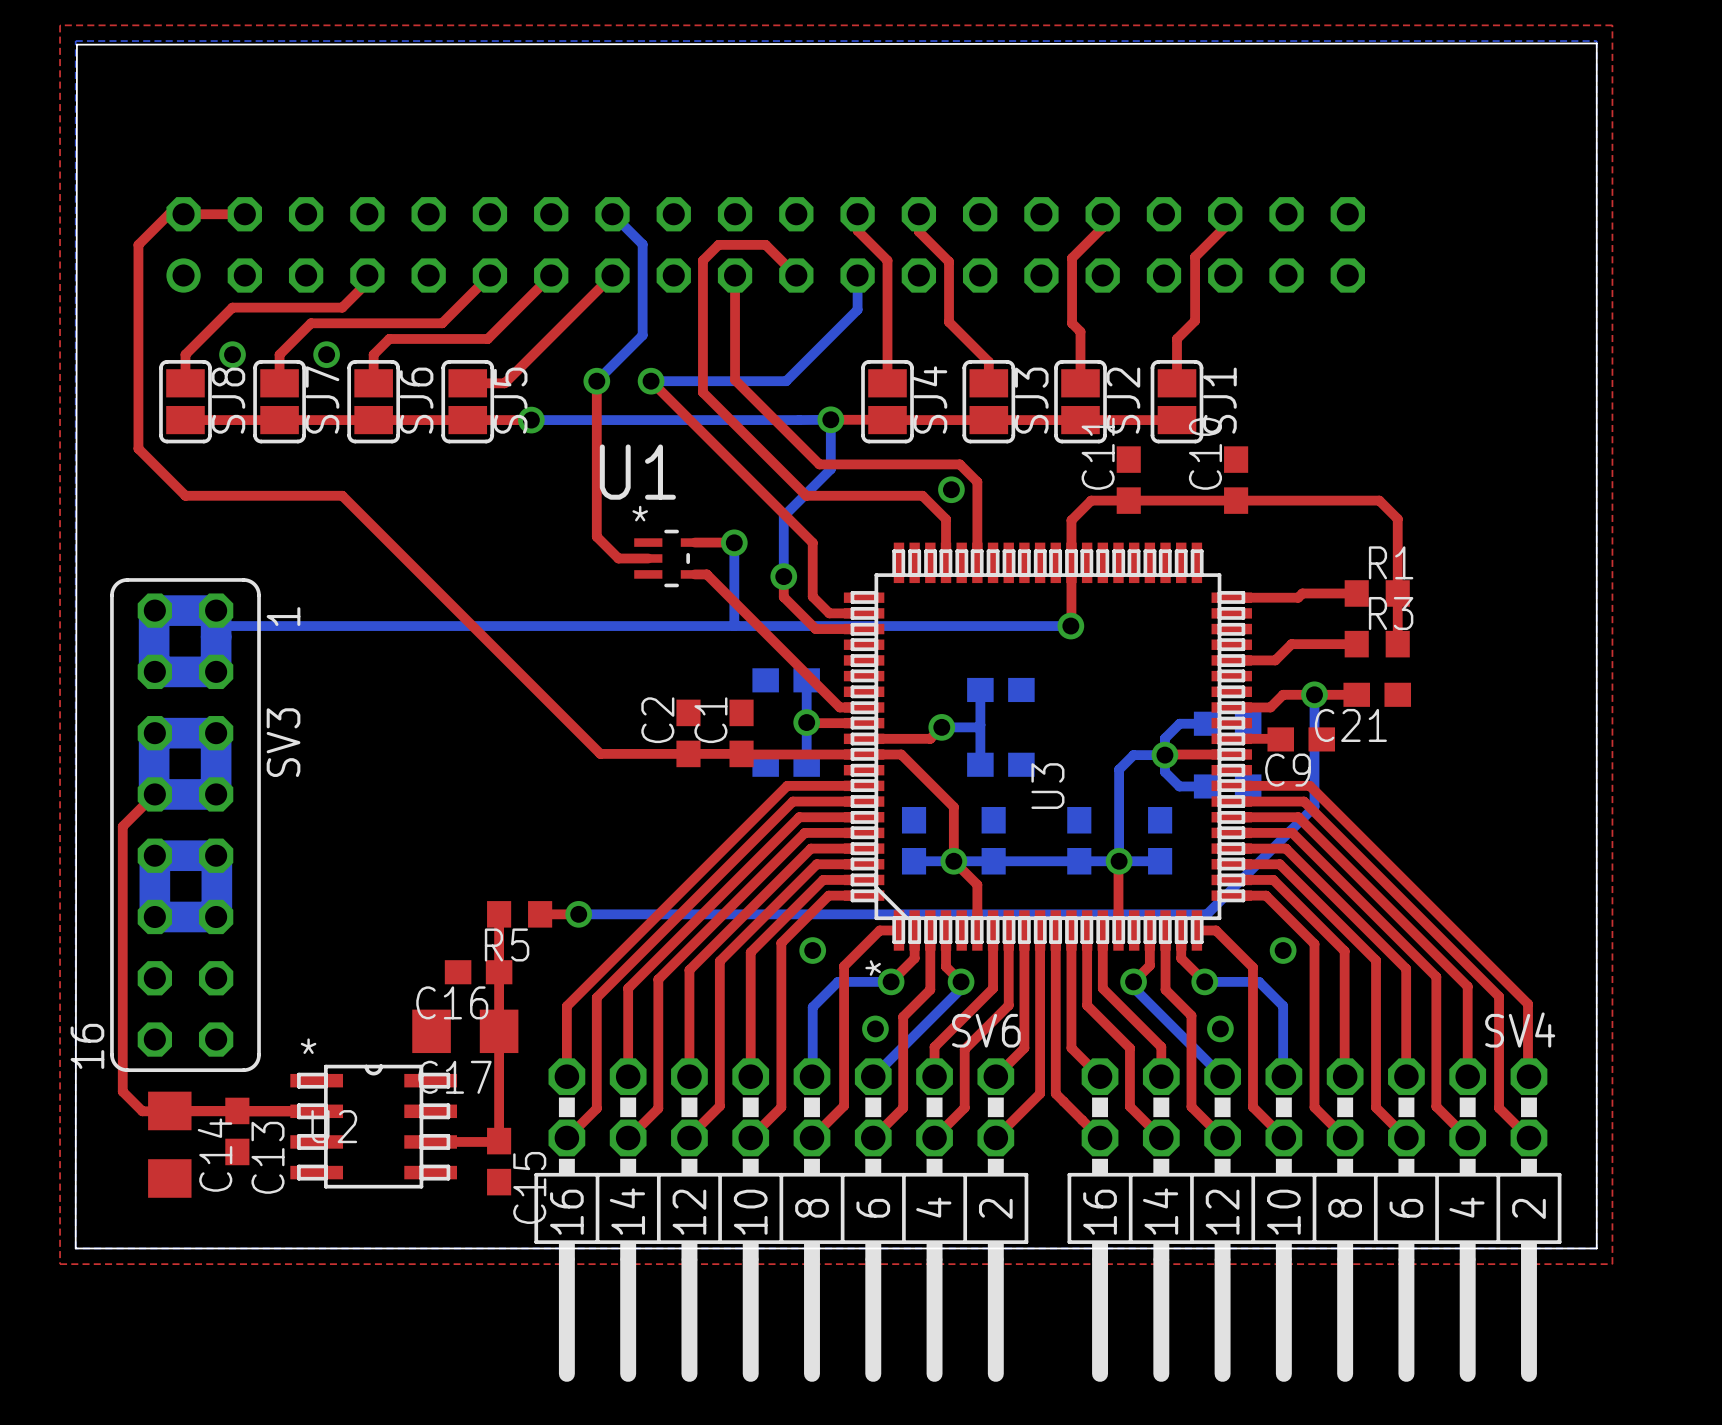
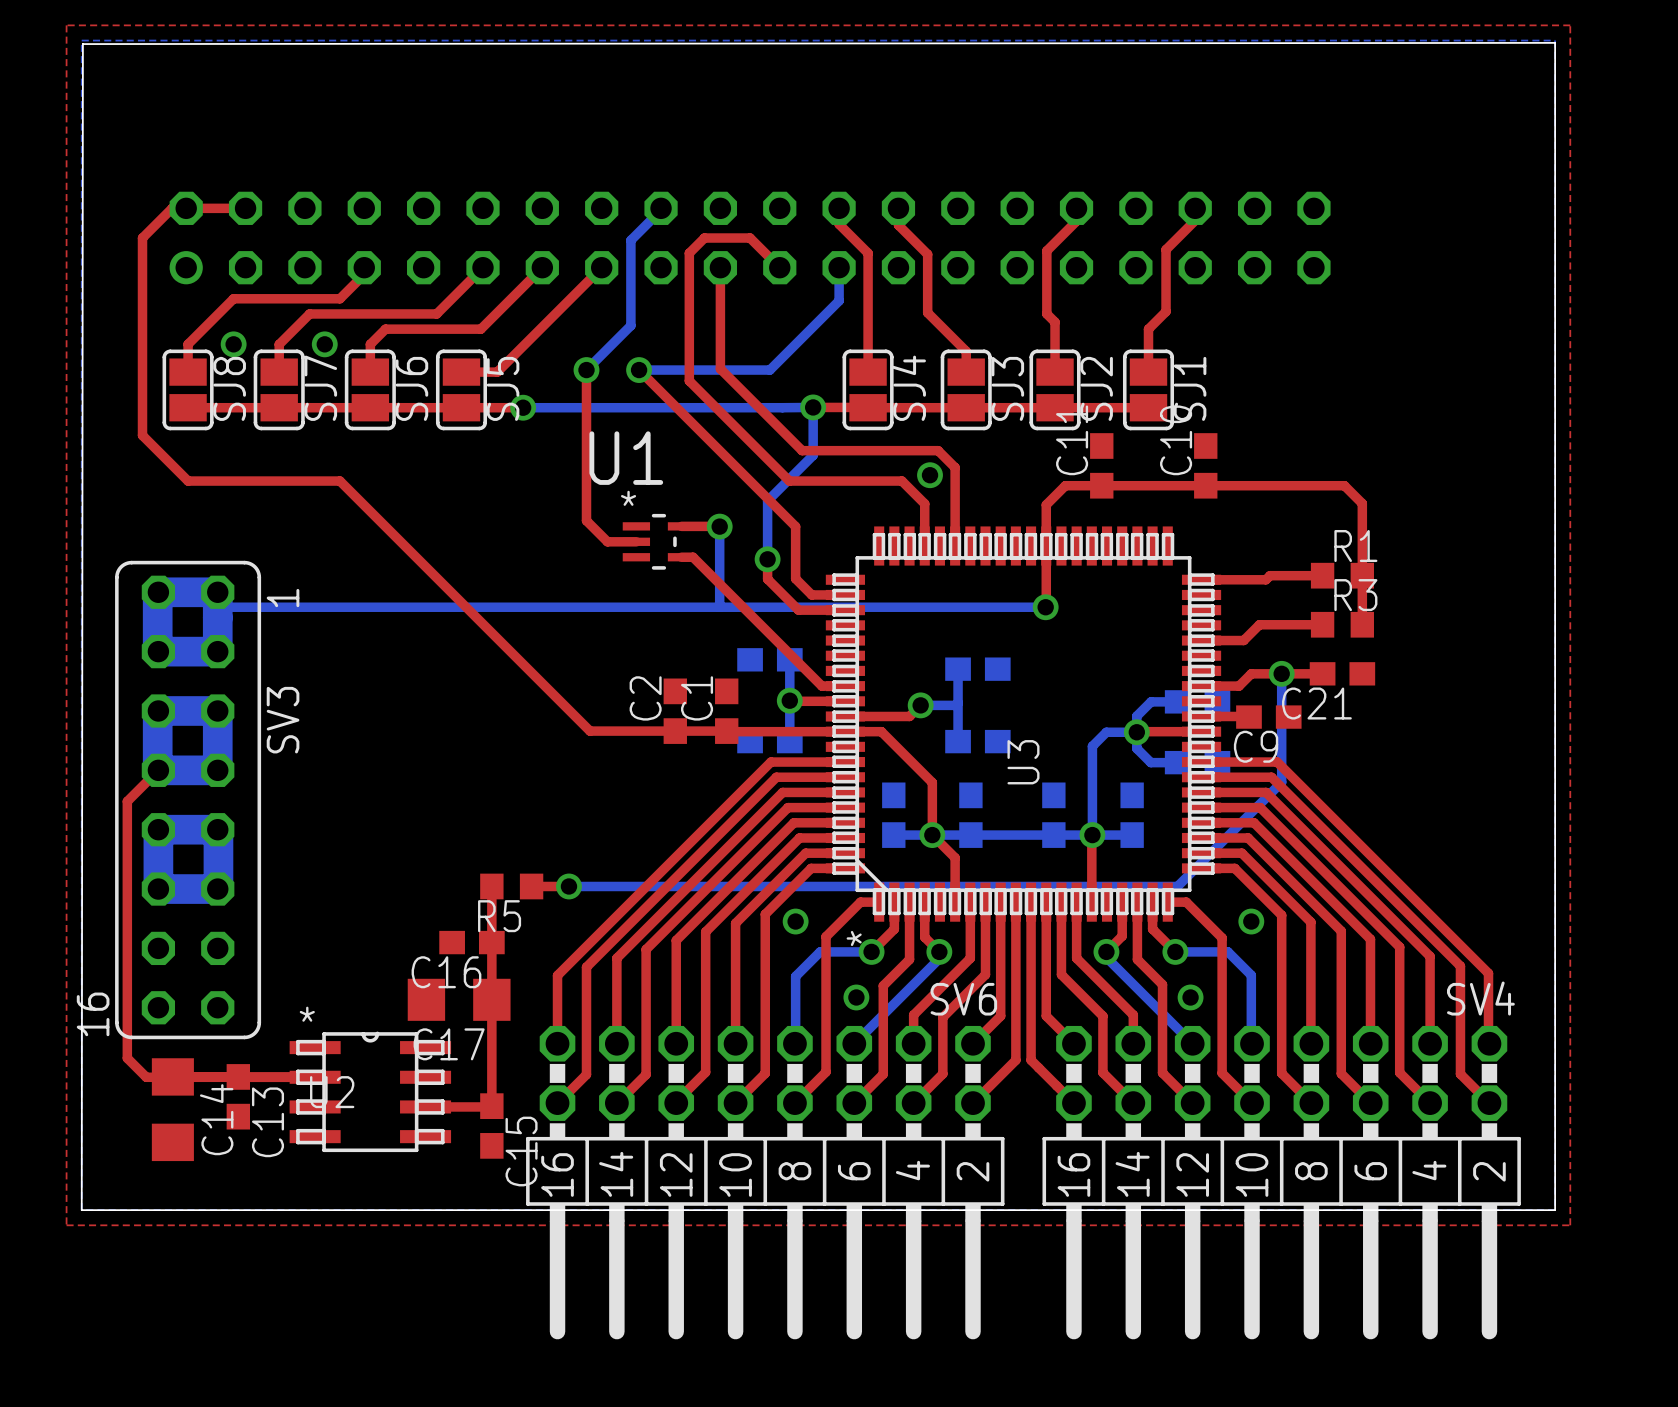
bottom track: (612, 214) (642, 244) (642, 247) -> (661, 208) (630, 240)

